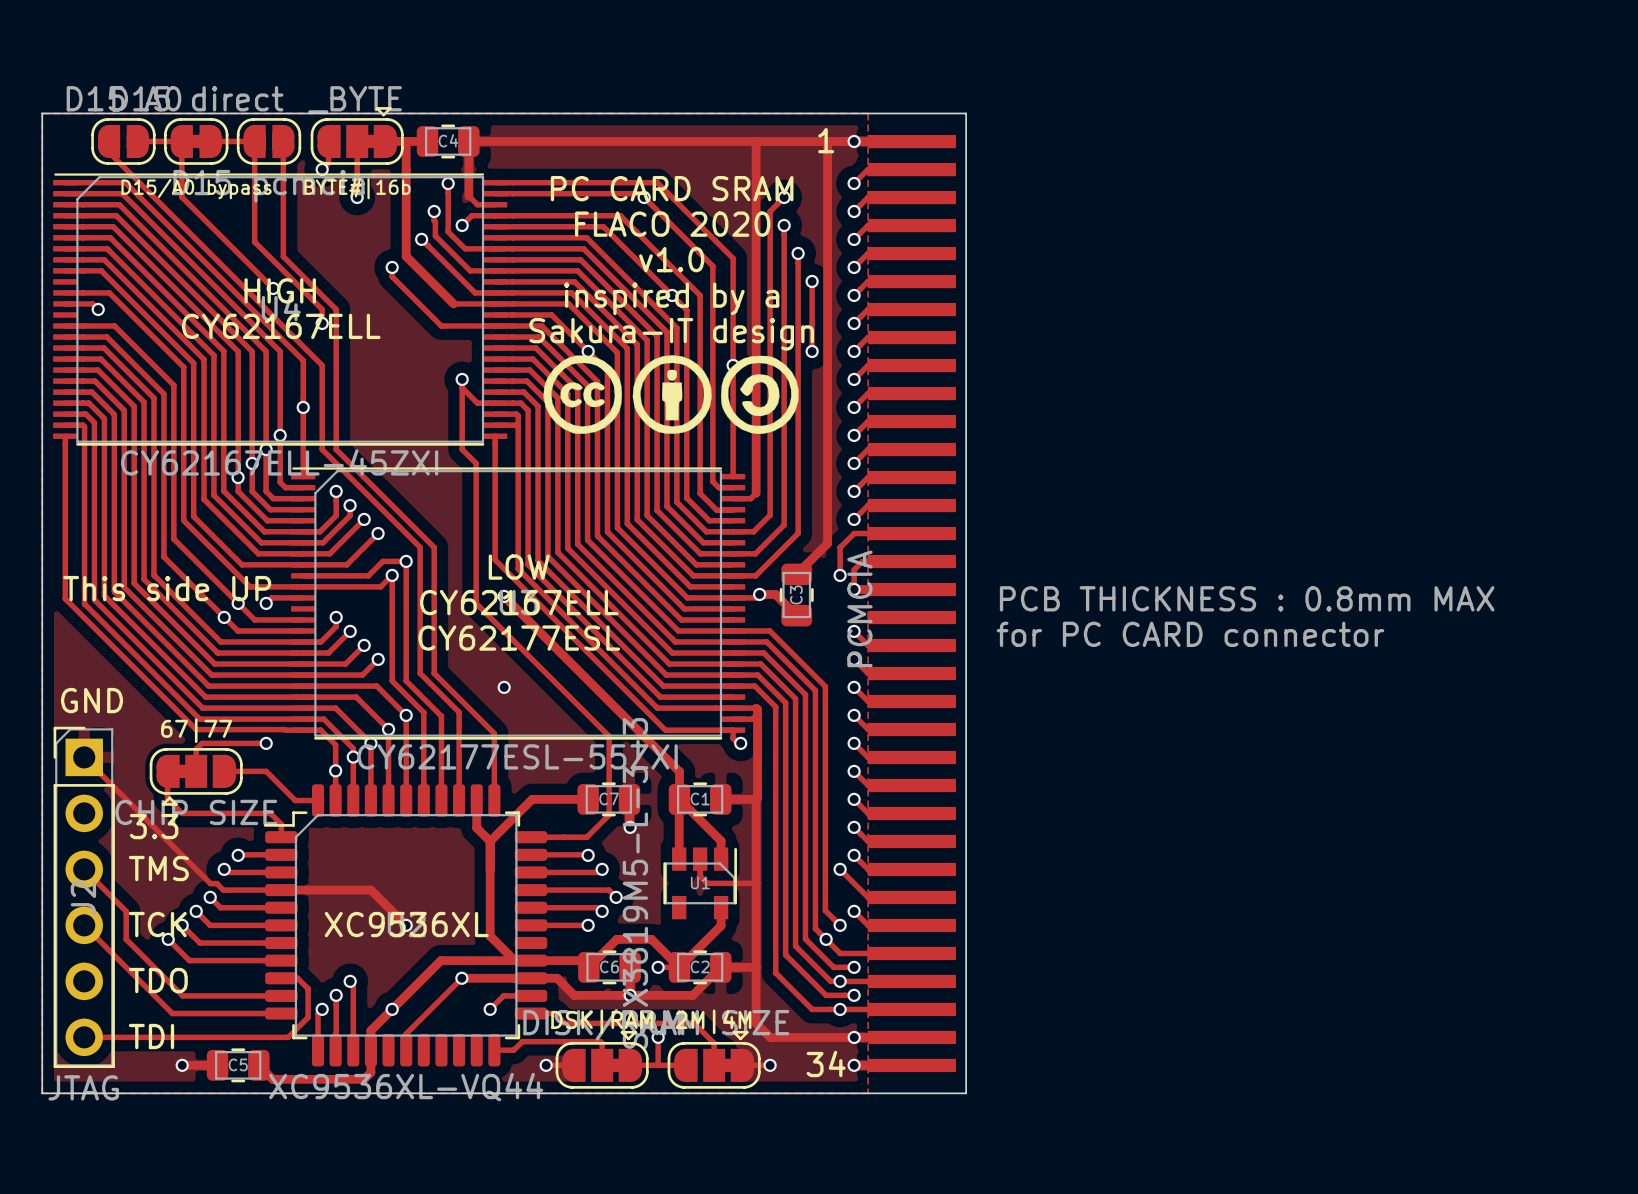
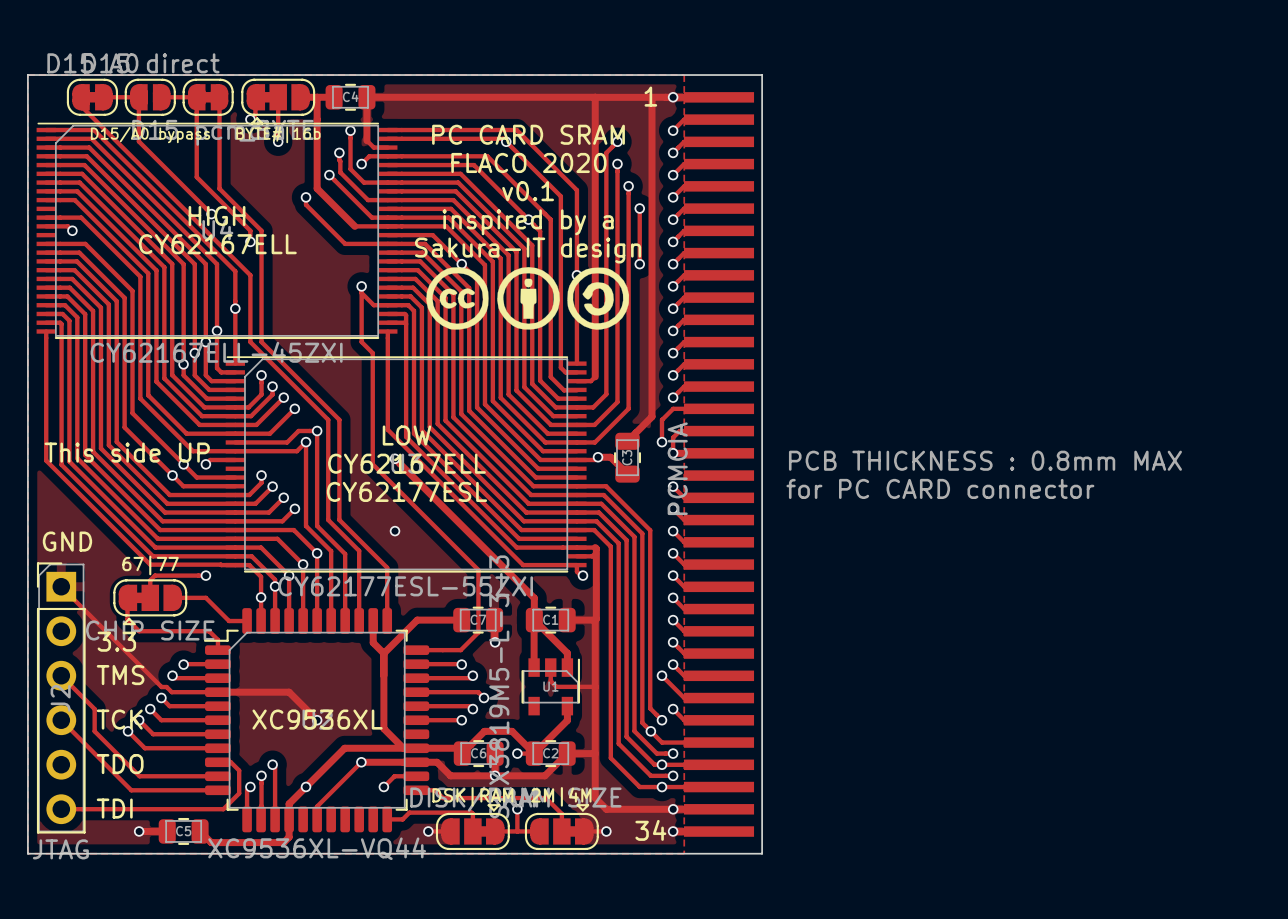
part footprint: [91, 118, 156, 165] -> [66, 78, 119, 116]
part footprint: [164, 118, 229, 165] -> [124, 78, 176, 116]
part footprint: [236, 118, 302, 165] -> [182, 78, 234, 116]
part rotation: 0° (357, 135) -> 180° (278, 101)
text: v1.0 (671, 259) -> v0.1 (528, 191)

